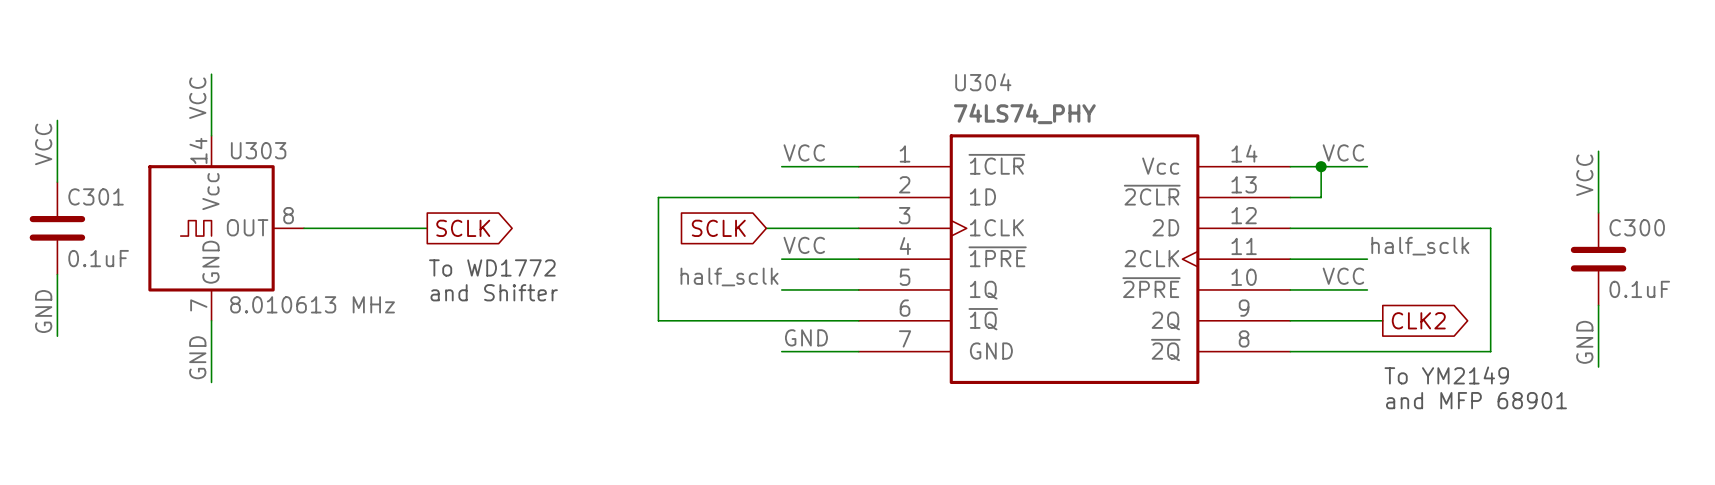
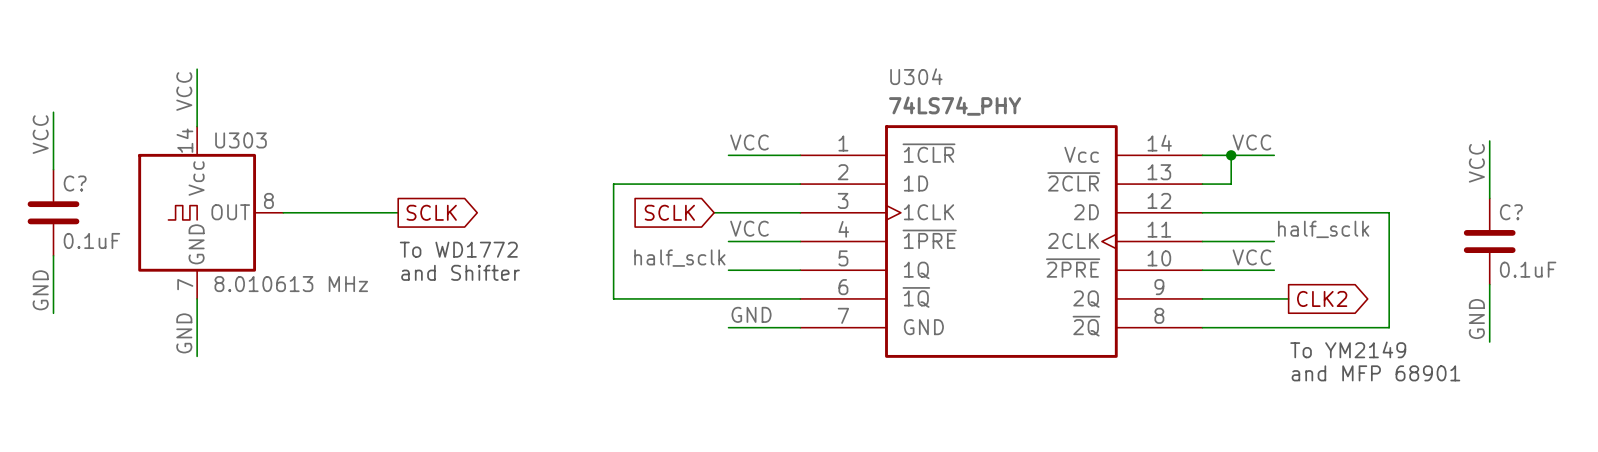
C301 name: C301 (96, 196) -> C? (75, 183)
C300 name: C300 (1637, 227) -> C? (1511, 212)

